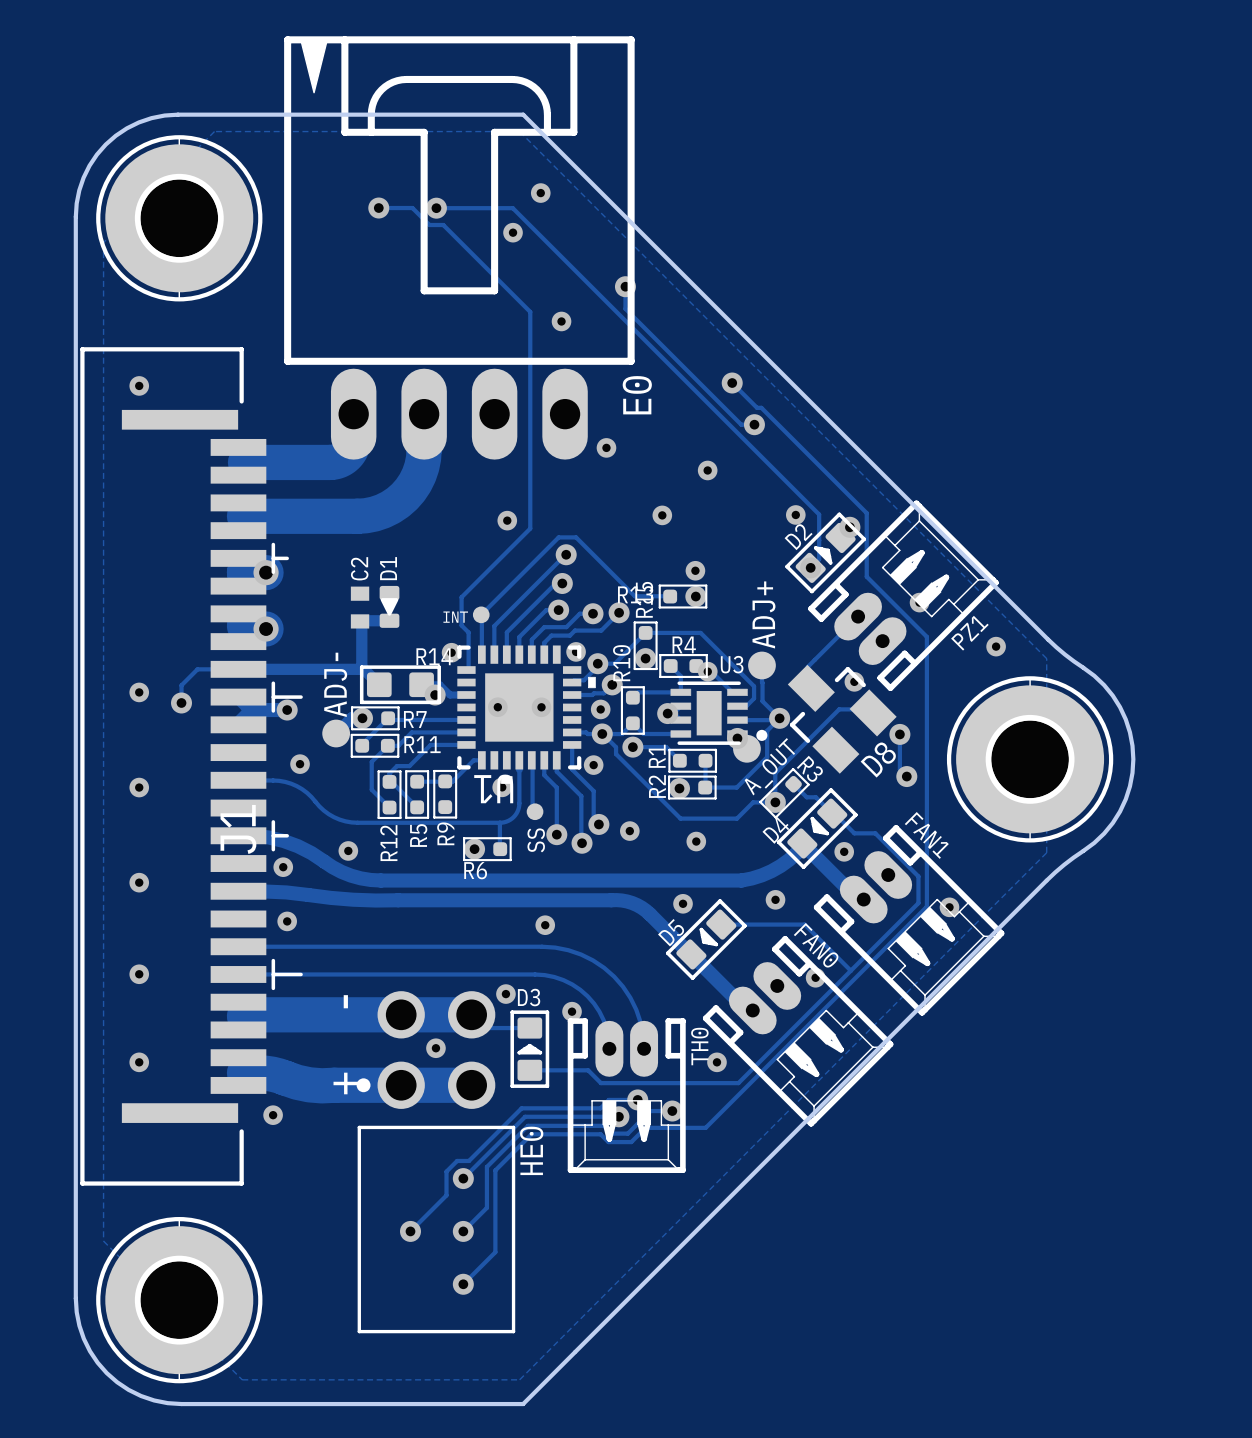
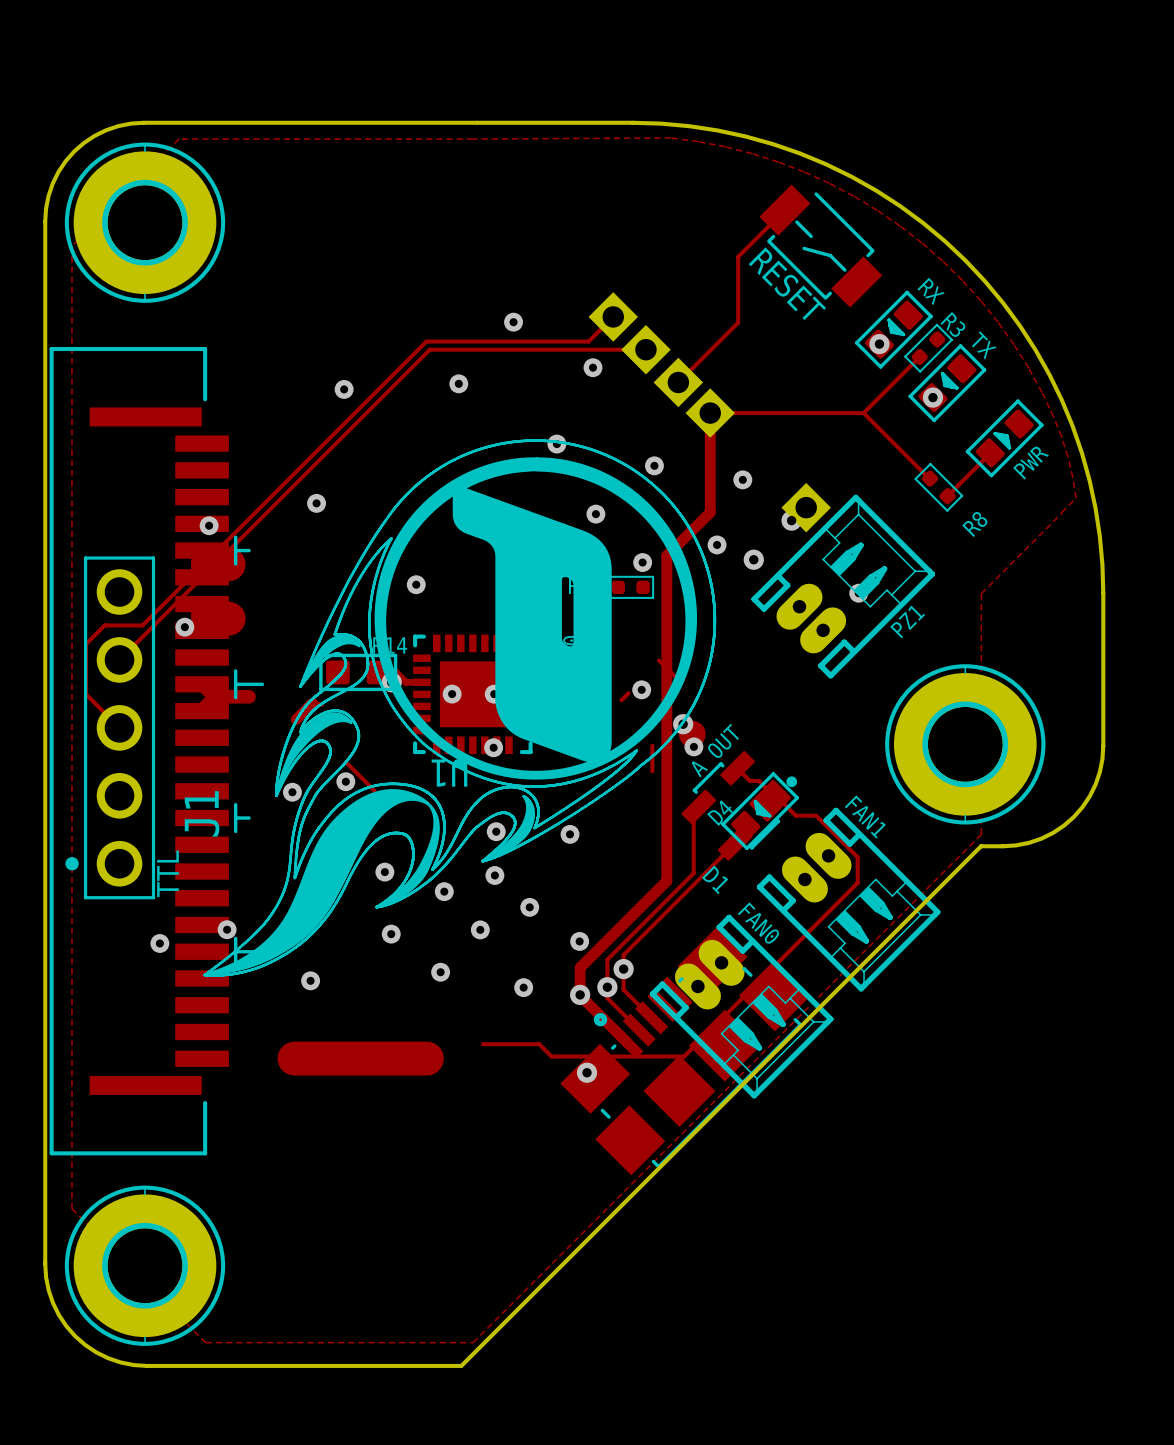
board edge: (523, 114) (1048, 639) (1104, 685) (1120, 707) (1125, 719) (1129, 732) (1133, 759) (1129, 786) (1125, 799) (1120, 811) (1104, 833) (1046, 880) (523, 1404) (507, 1404) -> (476, 122) (661, 123) (717, 130) (772, 144) (825, 164) (876, 190) (922, 222) (965, 260) (1003, 303) (1035, 349) (1061, 400) (1082, 453) (1095, 508) (1102, 564) (1103, 746) (1099, 771) (1095, 784) (1089, 796) (1073, 816) (1053, 832) (1029, 842) (1016, 845) (981, 846) (461, 1365)
zone outline: (519, 131) (1046, 658) -> (473, 139) (670, 137) (698, 141) (752, 153) (804, 171) (853, 196) (877, 210) (921, 242) (962, 280) (998, 322) (1028, 368) (1041, 392) (1061, 436) (1067, 456) (1076, 498) (981, 593) (981, 647)
via: (540, 193) -> none
track: (378, 208) (412, 208) (429, 225) (443, 225) (530, 311) (530, 528) (461, 597) (461, 625) (468, 632) (468, 667) (466, 670) -> none
via: (378, 208) -> none
track: (436, 208) (512, 208) (819, 514) (819, 559) (810, 567) -> none
via: (436, 208) -> none
via: (513, 232) -> none
RESET: none -> (820, 246)
E0: (459, 247) -> none
track: (625, 286) (625, 308) (741, 424) (754, 424) -> none
via: (625, 286) -> none
track: none -> (613, 316) (588, 341) (426, 341) (142, 625) (104, 625) (86, 644) (86, 694) (119, 727)
part: none -> (613, 316)
RX: none -> (893, 329)
via: none -> (879, 344)
track: none -> (645, 349) (429, 349) (119, 659)
part: none -> (645, 349)
track: none -> (919, 356) (863, 413)
via: none -> (593, 367)
track: (732, 383) (757, 407) (761, 407) (866, 513) (866, 576) (926, 636) (926, 906) (705, 1127) (645, 1127) (631, 1142) (608, 1142) (600, 1134) (531, 1134) (495, 1170) (495, 1252) (463, 1284) -> (678, 382) (738, 322) (738, 256) (784, 210)
via: (732, 383) -> none
part: none -> (678, 382)
TX: none -> (947, 383)
via: (139, 385) -> none
via: none -> (458, 383)
via: none -> (344, 389)
via: none -> (932, 397)
track: (353, 414) (352, 444) (346, 455) (339, 460) (330, 462) (245, 462) -> none
track: (424, 414) (423, 458) (419, 474) (410, 490) (390, 507) (374, 514) (357, 516) (244, 516) -> none
part: none -> (710, 413)
track: none -> (863, 413) (710, 413) (710, 512) (666, 555) (666, 881) (580, 967) (580, 995) (626, 1042)
track: none -> (863, 413) (930, 478)
via: (754, 424) -> none
PWR: none -> (1004, 438)
drawing: none -> [203, 439, 717, 977]
track: none -> (990, 452) (947, 496)
via: none -> (742, 479)
R8: none -> (938, 487)
via: none -> (316, 503)
part: none -> (806, 507)
via: (795, 514) -> none
via position: (662, 515) -> (595, 514)
via: (507, 520) -> none
via: none -> (209, 525)
via: none -> (717, 544)
D2: (825, 552) -> none
track: (566, 554) (494, 626) (494, 654) -> none
via: (566, 554) -> none
D1 name position: D1 (388, 568) -> D1 (715, 879)
via: (266, 572) -> none
track: (562, 583) (555, 583) (506, 632) (506, 654) -> none
via: (562, 583) -> none
D1 footprint: [379, 585, 400, 628] -> [681, 750, 798, 861]
via: none -> (416, 584)
track: (670, 596) (634, 596) (576, 537) (558, 537) (481, 614) (481, 654) -> none
via: (695, 596) -> none
C2: (360, 607) -> none
via: (558, 610) -> none
track: (559, 610) (546, 610) (519, 637) (519, 654) -> none
track: (619, 612) (601, 630) (574, 630) (569, 635) (551, 635) (544, 642) (544, 654) -> none
via: (619, 612) -> none
track: (593, 613) (579, 613) (566, 627) (544, 627) (531, 639) (531, 654) -> none
via: (593, 613) -> none
INT: (481, 614) -> none
track: (858, 616) (807, 666) (807, 684) (811, 688) -> none
track: (389, 620) (360, 621) (361, 623) (361, 667) (359, 669) -> none
via: (266, 629) -> none
via: none -> (184, 627)
via: (996, 646) -> none
via: (576, 651) -> none
via: (451, 652) -> none
via: (645, 658) -> none
via: (597, 663) -> none
track: (761, 665) (762, 701) (779, 718) (767, 730) (767, 757) (736, 787) (705, 787) -> none
ADJ+: (761, 665) -> none
track: (670, 666) (680, 676) (680, 692) (638, 692) (632, 697) -> none
R4: (683, 666) -> none
via position: (707, 671) -> (641, 689)
via: (854, 681) -> none
track: (572, 682) (574, 680) (583, 680) (597, 666) (597, 663) (614, 663) (645, 632) (700, 632) (754, 686) (754, 698) (746, 705) (737, 706) -> none
track: (377, 684) (379, 684) (363, 669) (197, 669) (181, 685) (181, 702) -> none
track: (612, 684) (603, 693) (572, 695) -> none
via: (612, 684) -> none
via: (139, 692) -> none
via: (181, 702) -> none
via: (600, 709) -> none
via: (287, 710) -> none
track: (873, 712) (869, 709) (839, 709) (775, 773) (775, 802) (753, 802) (736, 818) (680, 818) (616, 754) (616, 747) (602, 734) -> none
via: (667, 713) -> none
U3: (719, 713) -> none
via: (362, 718) -> none
R7: (375, 718) -> none
via: (779, 718) -> none
track: (466, 719) (389, 719) (388, 718) (362, 745) -> none
D8: (842, 719) -> none
track: (737, 720) (777, 720) -> none
track: (466, 732) (411, 732) (398, 745) (387, 745) (371, 761) (371, 789) (389, 807) -> none
track: (572, 732) (622, 734) (632, 723) (643, 734) (680, 734) -> none
ADJ-: (336, 733) -> none
via: (602, 733) -> none
track: (899, 734) (899, 769) (906, 776) -> none
via: (899, 734) -> none
TTL: none -> (110, 727)
track: (466, 744) (430, 744) (409, 766) (396, 766) (389, 773) (389, 781) -> none
track: (572, 744) (572, 769) (593, 791) (593, 819) (598, 824) -> none
R11: (375, 745) -> none
track: (632, 747) (666, 747) (679, 760) -> none
via: (632, 747) -> none
track: (481, 760) (473, 760) (452, 781) (417, 781) -> none
track: (531, 760) (532, 809) (535, 811) -> none
track: (544, 760) (544, 775) (556, 787) (556, 834) -> none
track: (556, 760) (556, 771) (581, 796) (582, 843) -> none
R1: (692, 760) -> none
via: none -> (693, 746)
via: none -> (493, 747)
via: (300, 764) -> none
via: (593, 765) -> none
track: (519, 769) (519, 760) (518, 809) (512, 818) (499, 822) -> none
via: (906, 776) -> none
track: (238, 780) (279, 780) (291, 783) (306, 792) (328, 814) (351, 822) (499, 822) -> none
via: (139, 787) -> none
via: (502, 787) -> none
R2: (692, 787) -> none
via: (679, 788) -> none
R3 position: (784, 793) -> (928, 348)
R12: (389, 794) -> none
R5: (417, 794) -> none
R9: (445, 794) -> none
via: none -> (345, 781)
via: (775, 802) -> none
via: none -> (292, 792)
SS: (535, 811) -> none
track: (499, 822) (499, 848) -> none
via: (598, 824) -> none
track: none -> (698, 807) (693, 812) (693, 873) (607, 959) (607, 998) (639, 1030)
via position: (629, 831) -> (570, 834)
via position: (556, 834) -> (496, 831)
track: (238, 835) (253, 835) (283, 840) (311, 853) (341, 871) (360, 878) (380, 880) (741, 880) (761, 875) (780, 865) (802, 847) (802, 843) (858, 899) (863, 899) -> none
via: (696, 841) -> none
via: (582, 843) -> none
via: (474, 849) -> none
R6: (487, 849) -> none
via: (348, 850) -> none
via: (844, 851) -> none
track: none -> (735, 843) (623, 954) (623, 989) (651, 1017)
via: (283, 867) -> none
via: (139, 882) -> none
track: (238, 891) (286, 892) (375, 900) (627, 901) (646, 910) (747, 1010) (752, 1010) -> none
via: none -> (384, 872)
via: none -> (494, 875)
via: (775, 899) -> none
via: (683, 903) -> none
via: (949, 907) -> none
via: none -> (444, 891)
via position: (287, 921) -> (227, 929)
track: (721, 924) (804, 924) (850, 970) -> none
via: (545, 925) -> none
via: none -> (529, 907)
D5: (706, 939) -> none
track: (238, 946) (541, 946) (568, 950) (593, 960) (614, 976) (622, 986) (636, 1009) (643, 1035) (644, 1048) -> none
via: none -> (480, 929)
via: none -> (391, 934)
via: none -> (579, 941)
via: none -> (159, 943)
via: (139, 974) -> none
track: (238, 974) (535, 974) (554, 977) (580, 989) (594, 1003) (606, 1029) (609, 1048) -> none
via: (815, 977) -> none
via: none -> (623, 969)
via position: (505, 994) -> (440, 972)
via: none -> (310, 980)
via: none -> (607, 987)
track: (244, 1016) (246, 1014) (471, 1014) (484, 1028) (529, 1028) -> none
via: none -> (580, 994)
text: + - (345, 1044) -> none
via: (435, 1048) -> none
D3: (529, 1049) -> none
via: (139, 1062) -> none
via: (716, 1062) -> none
track: (244, 1072) (272, 1074) (297, 1082) (321, 1085) (401, 1085) -> none
part: none -> (684, 1050)
TH0: (626, 1095) -> none
track: (637, 1099) (608, 1099) (600, 1108) (521, 1108) (468, 1160) (457, 1160) (446, 1171) (446, 1195) (410, 1231) -> none
track: (672, 1111) (650, 1111) (627, 1133) (611, 1133) (604, 1125) (528, 1125) (486, 1166) (486, 1207) (463, 1231) -> none
via: (672, 1111) -> none
via: (273, 1115) -> none
track: (618, 1116) (525, 1116) (463, 1178) -> none
via: (618, 1116) -> none
HE0: (435, 1162) -> none
via: (463, 1178) -> none
via: (410, 1231) -> none
via: (463, 1231) -> none
via: (463, 1284) -> none

